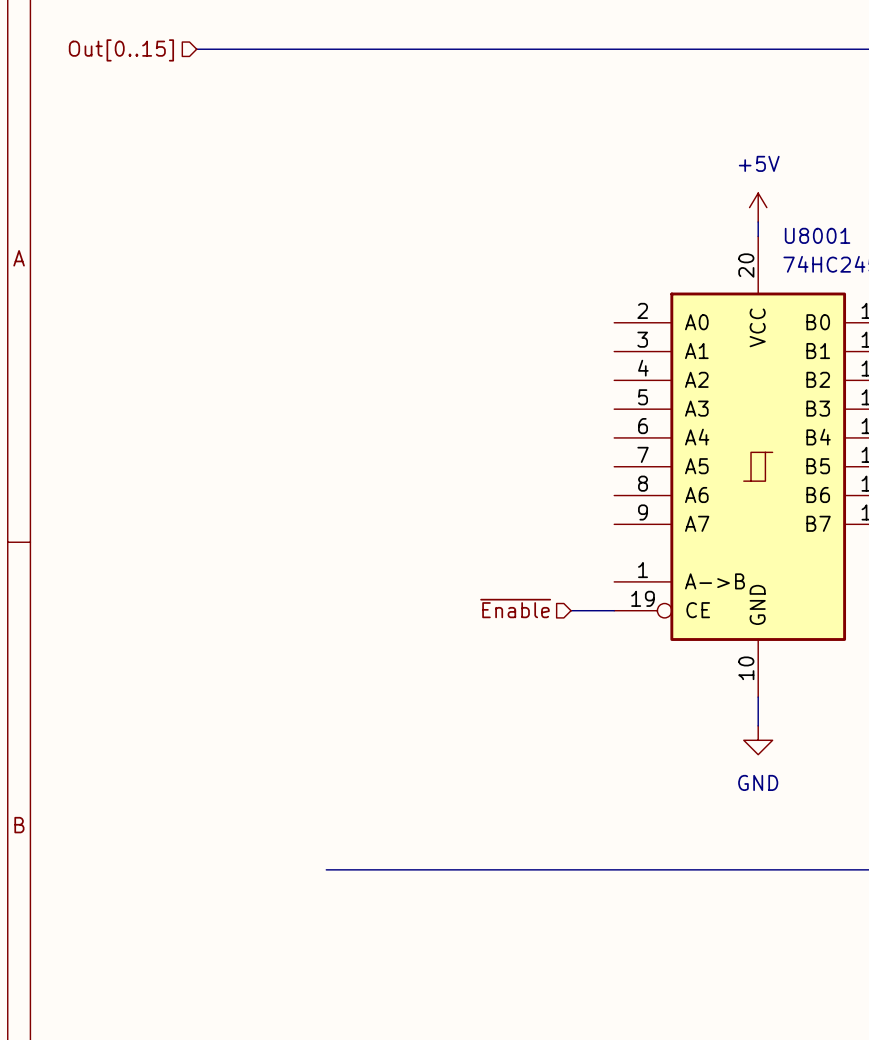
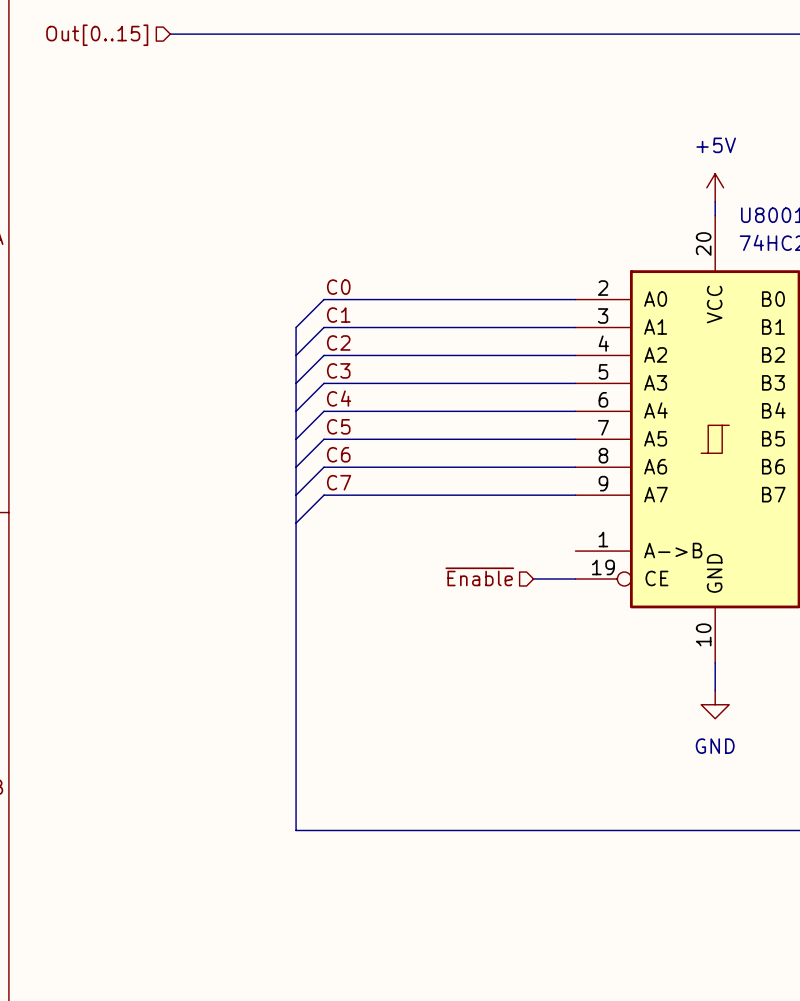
label: none -> C0 (338, 287)
wire: none -> (575, 299) (323, 299) (296, 327)
label: none -> C1 (338, 315)
bus: none -> (296, 327) (296, 830)
wire: none -> (575, 327) (323, 327) (296, 355)
label: none -> C2 (338, 342)
wire: none -> (575, 355) (323, 355) (296, 383)
label: none -> C3 (338, 370)
wire: none -> (575, 383) (323, 383) (296, 411)
label: none -> C4 (339, 398)
wire: none -> (575, 411) (323, 411) (296, 439)
label: none -> C5 (338, 426)
wire: none -> (575, 439) (323, 439) (296, 467)
label: none -> C6 (338, 454)
wire: none -> (575, 467) (323, 467) (296, 495)
label: none -> C7 (339, 482)
wire: none -> (575, 495) (323, 495) (296, 523)

